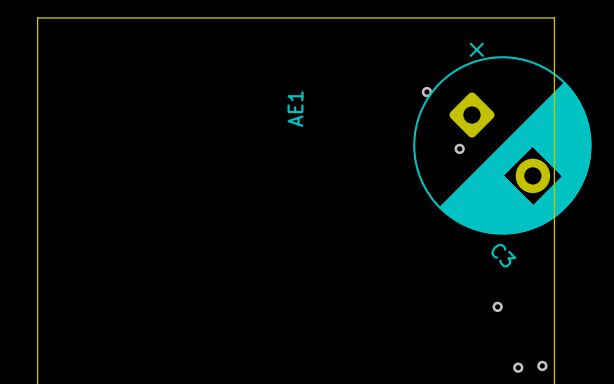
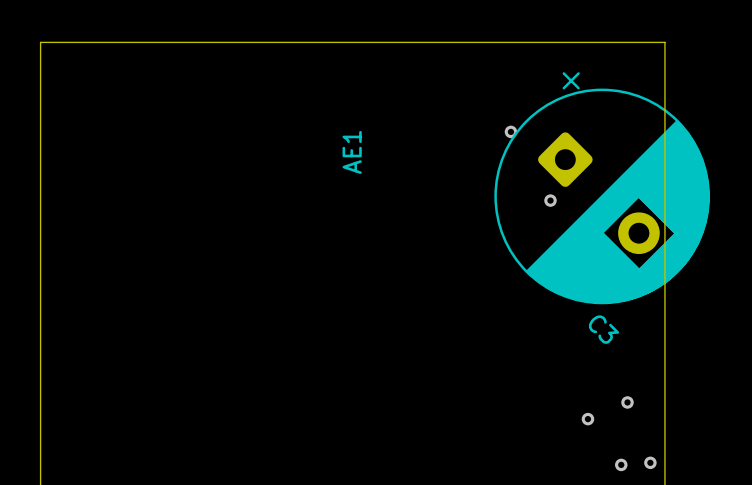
via: (497, 306) -> none
via: none -> (627, 402)
via: none -> (587, 419)

